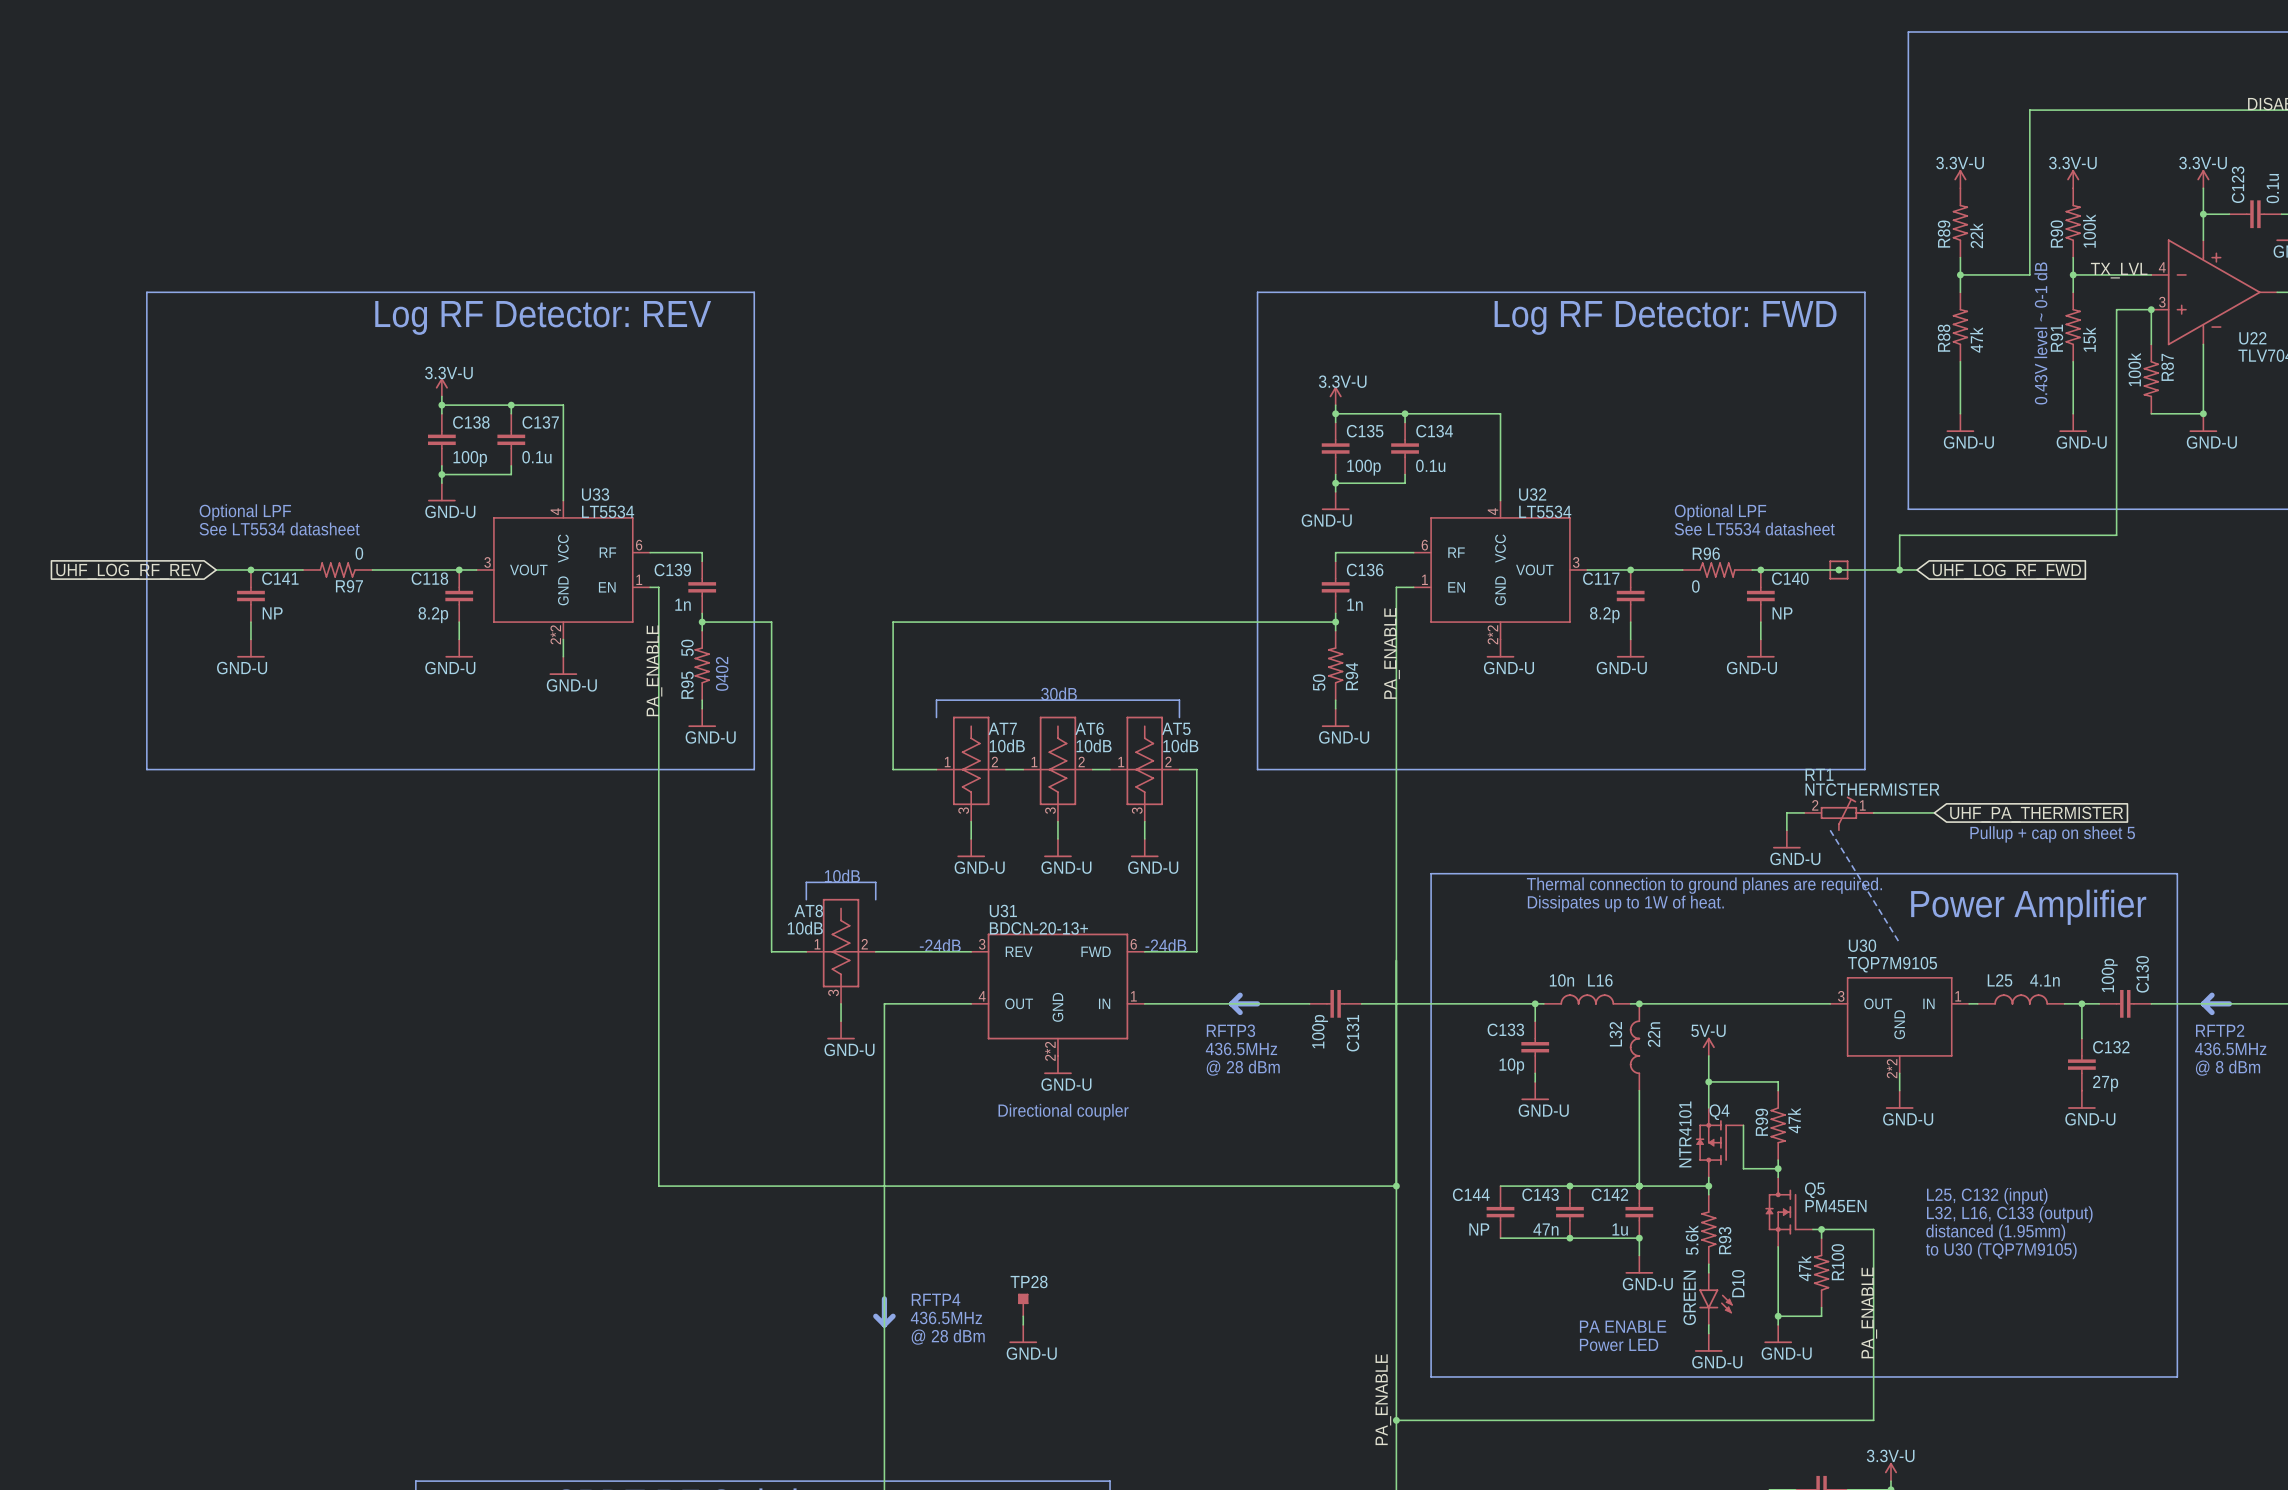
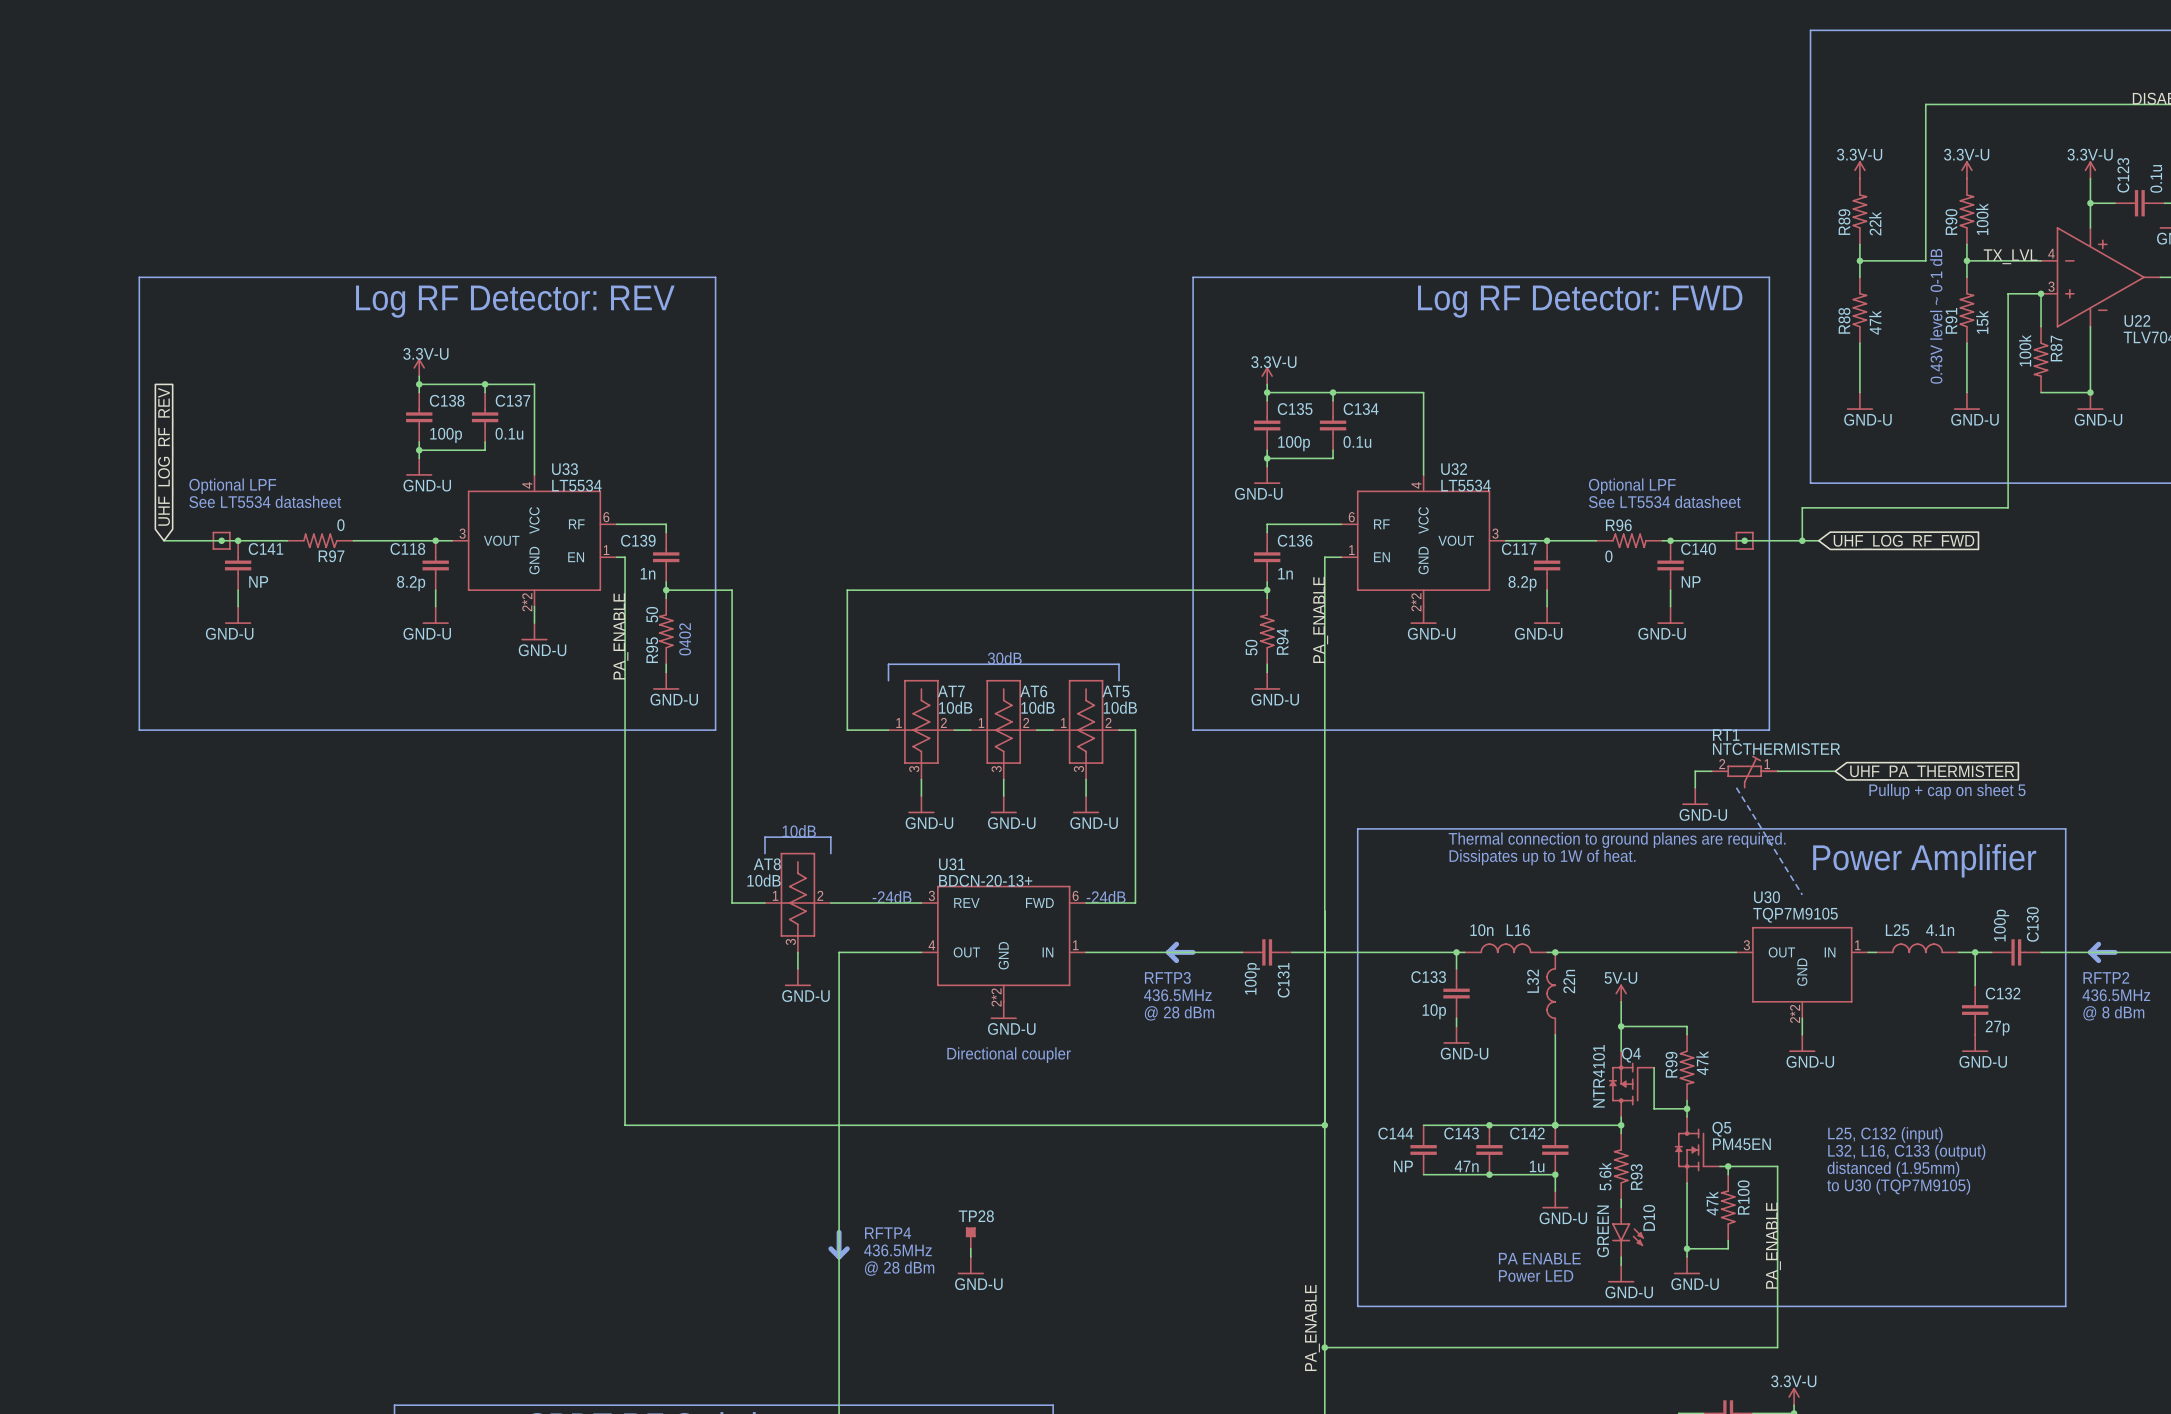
wire: none -> (164, 540) (205, 540)
part: none -> (221, 540)
junction: none -> (221, 540)
global label rotation: 0° (128, 571) -> 90° clockwise (165, 456)

